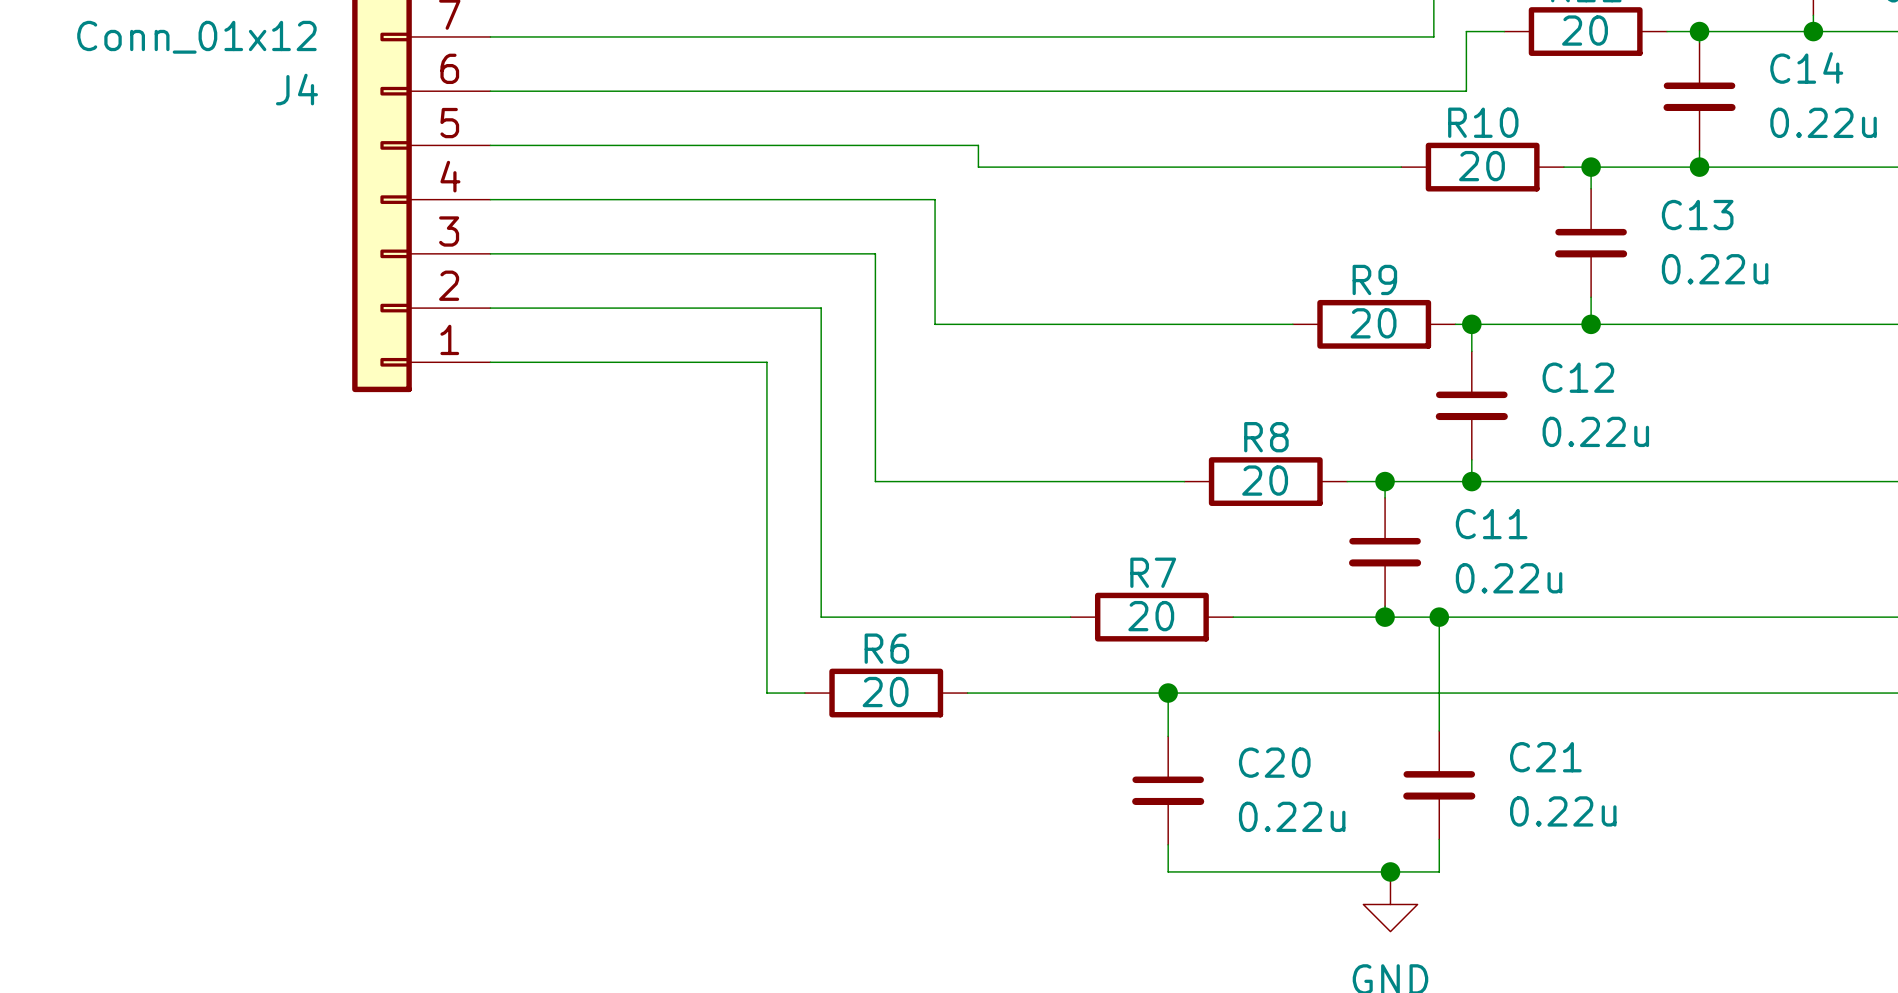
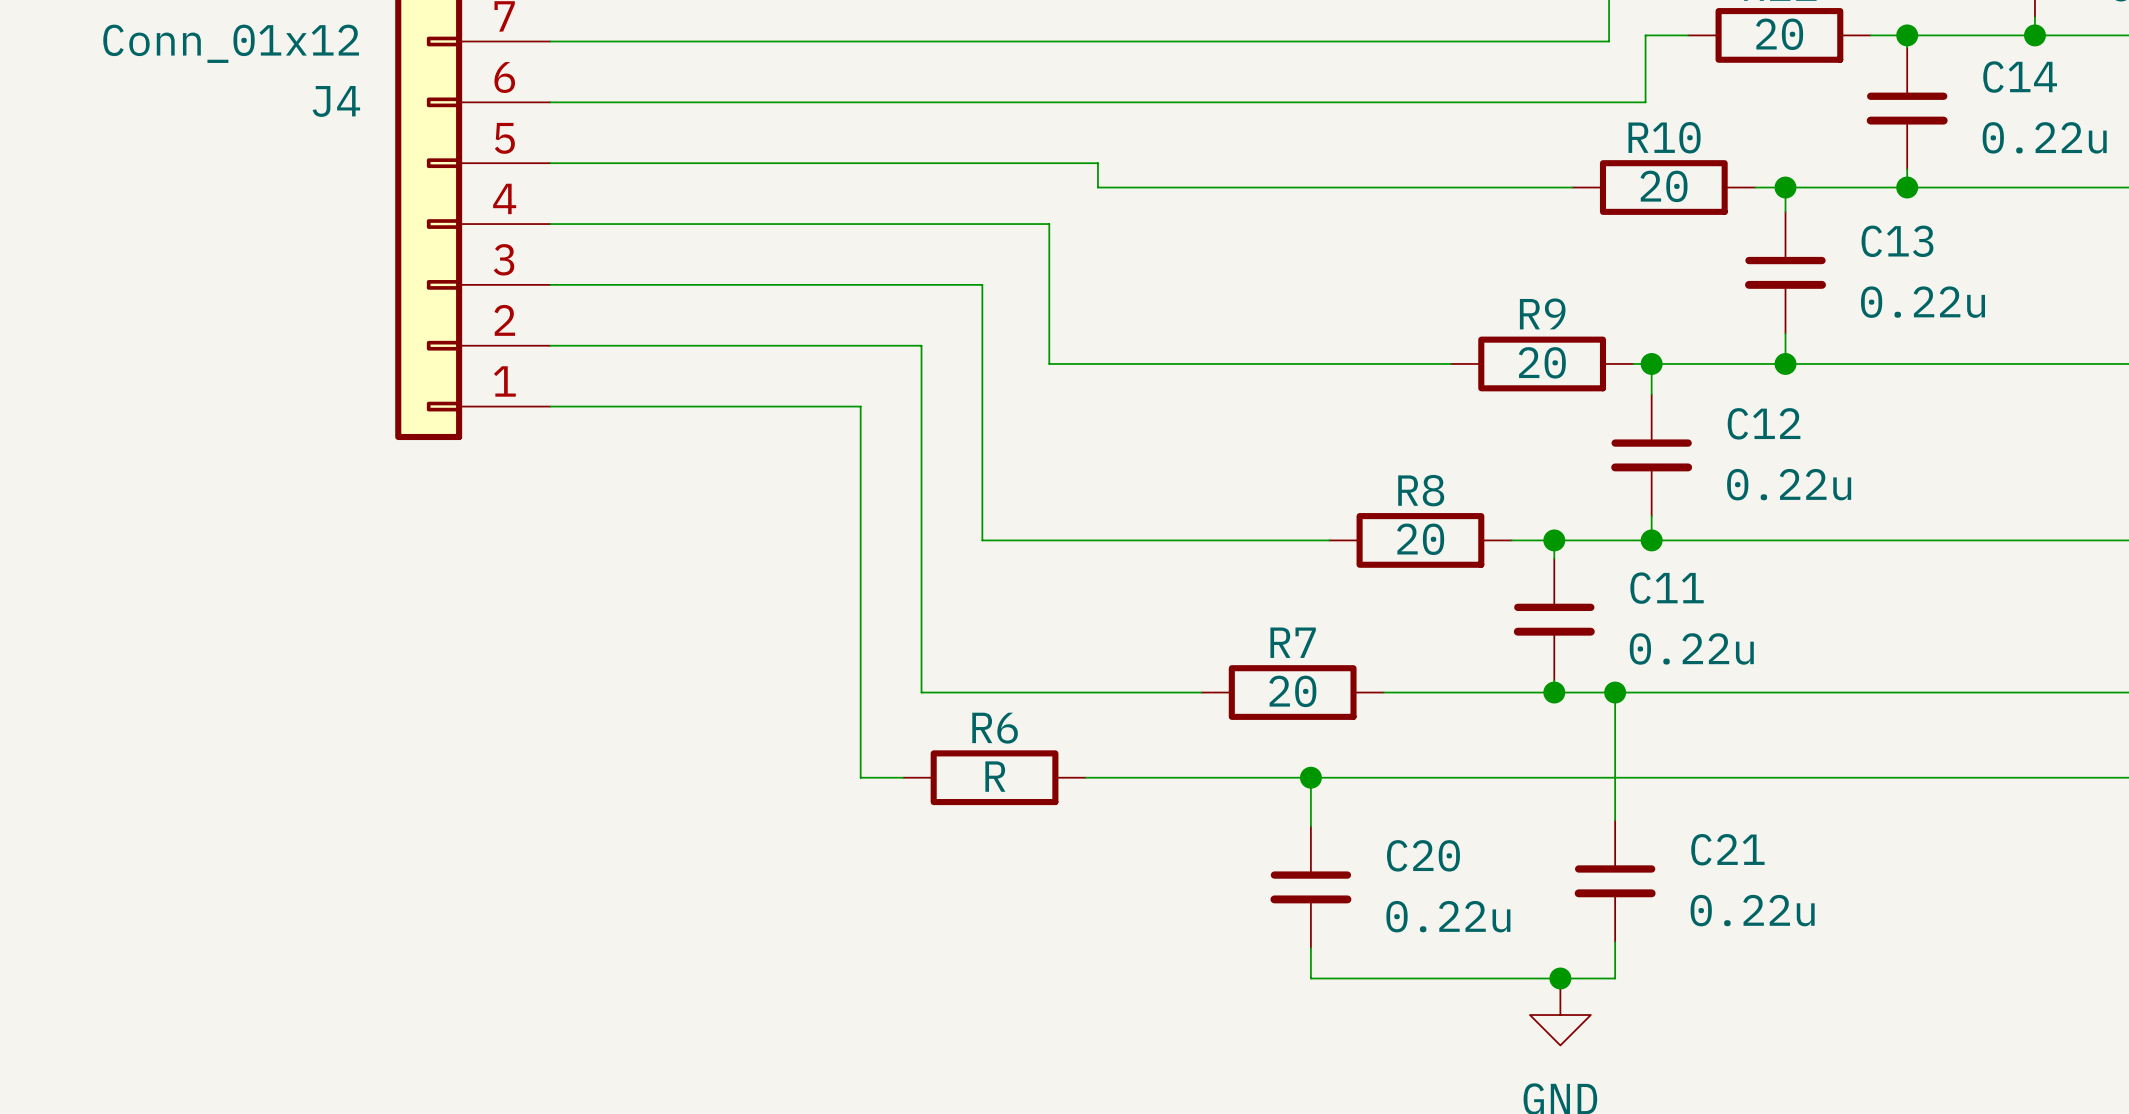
R6 value: 20 (885, 692) -> R (995, 776)

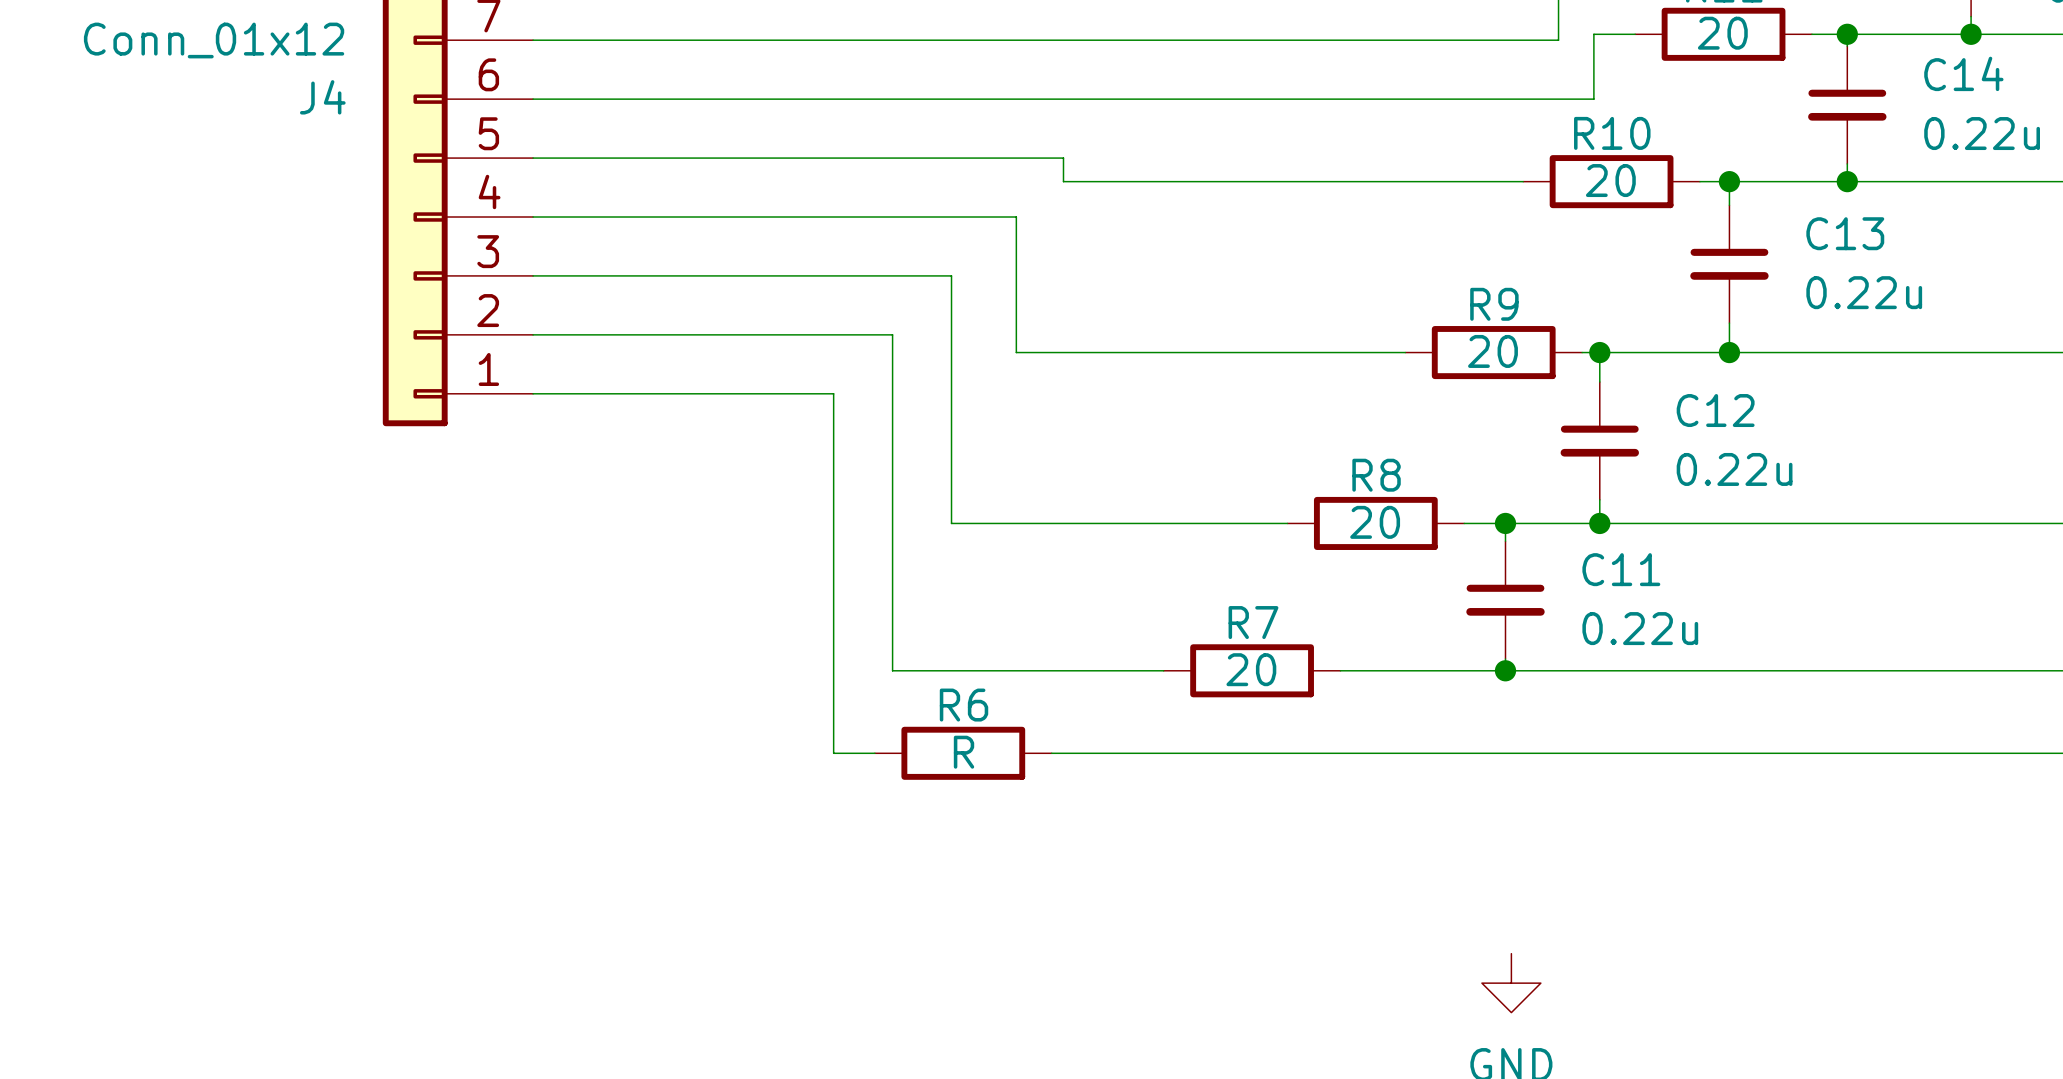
wire: (1615, 692) (1615, 820) -> none
junction: (1615, 692) -> none
wire: (1310, 777) (1310, 826) -> none
junction: (1310, 777) -> none
C21: 0.22u (1615, 881) -> none
C20: 0.22u (1310, 887) -> none
wire: (1615, 941) (1615, 978) (1310, 978) (1310, 948) -> none
junction: (1560, 978) -> none

